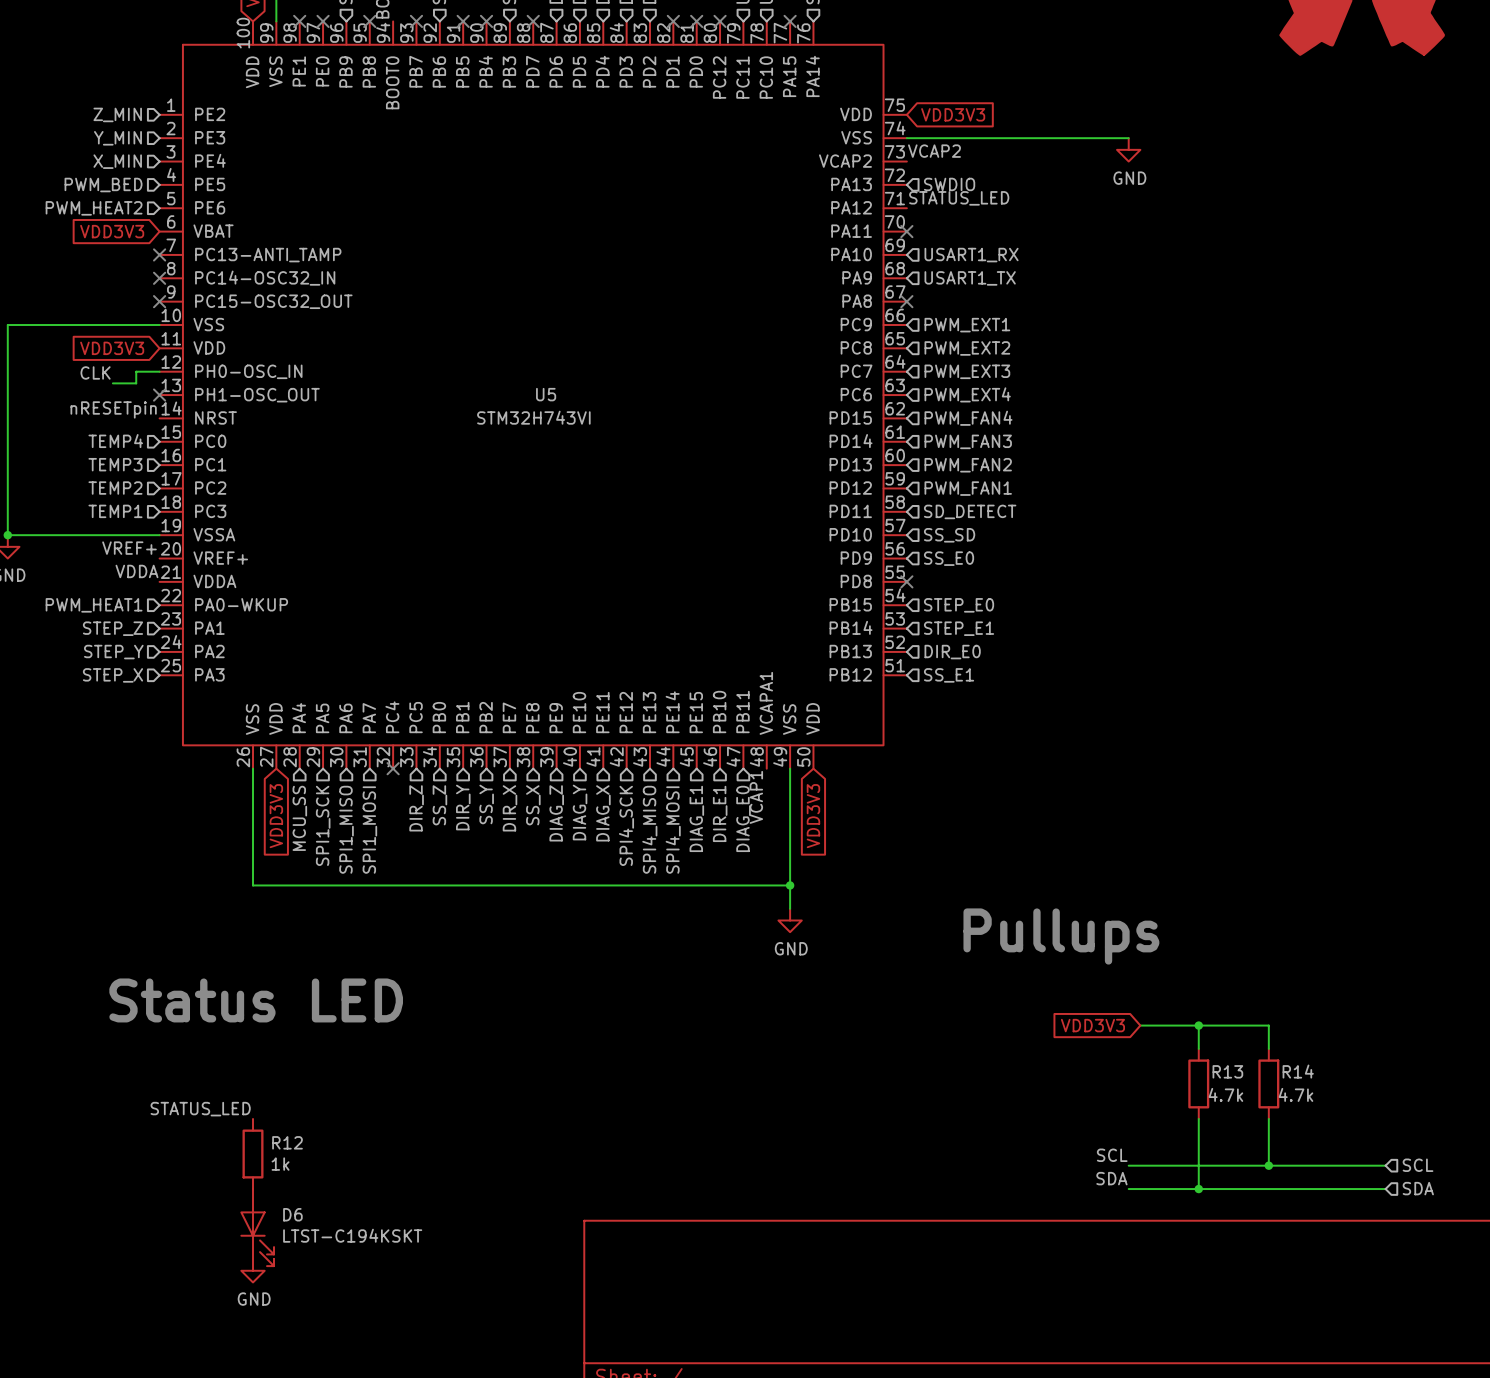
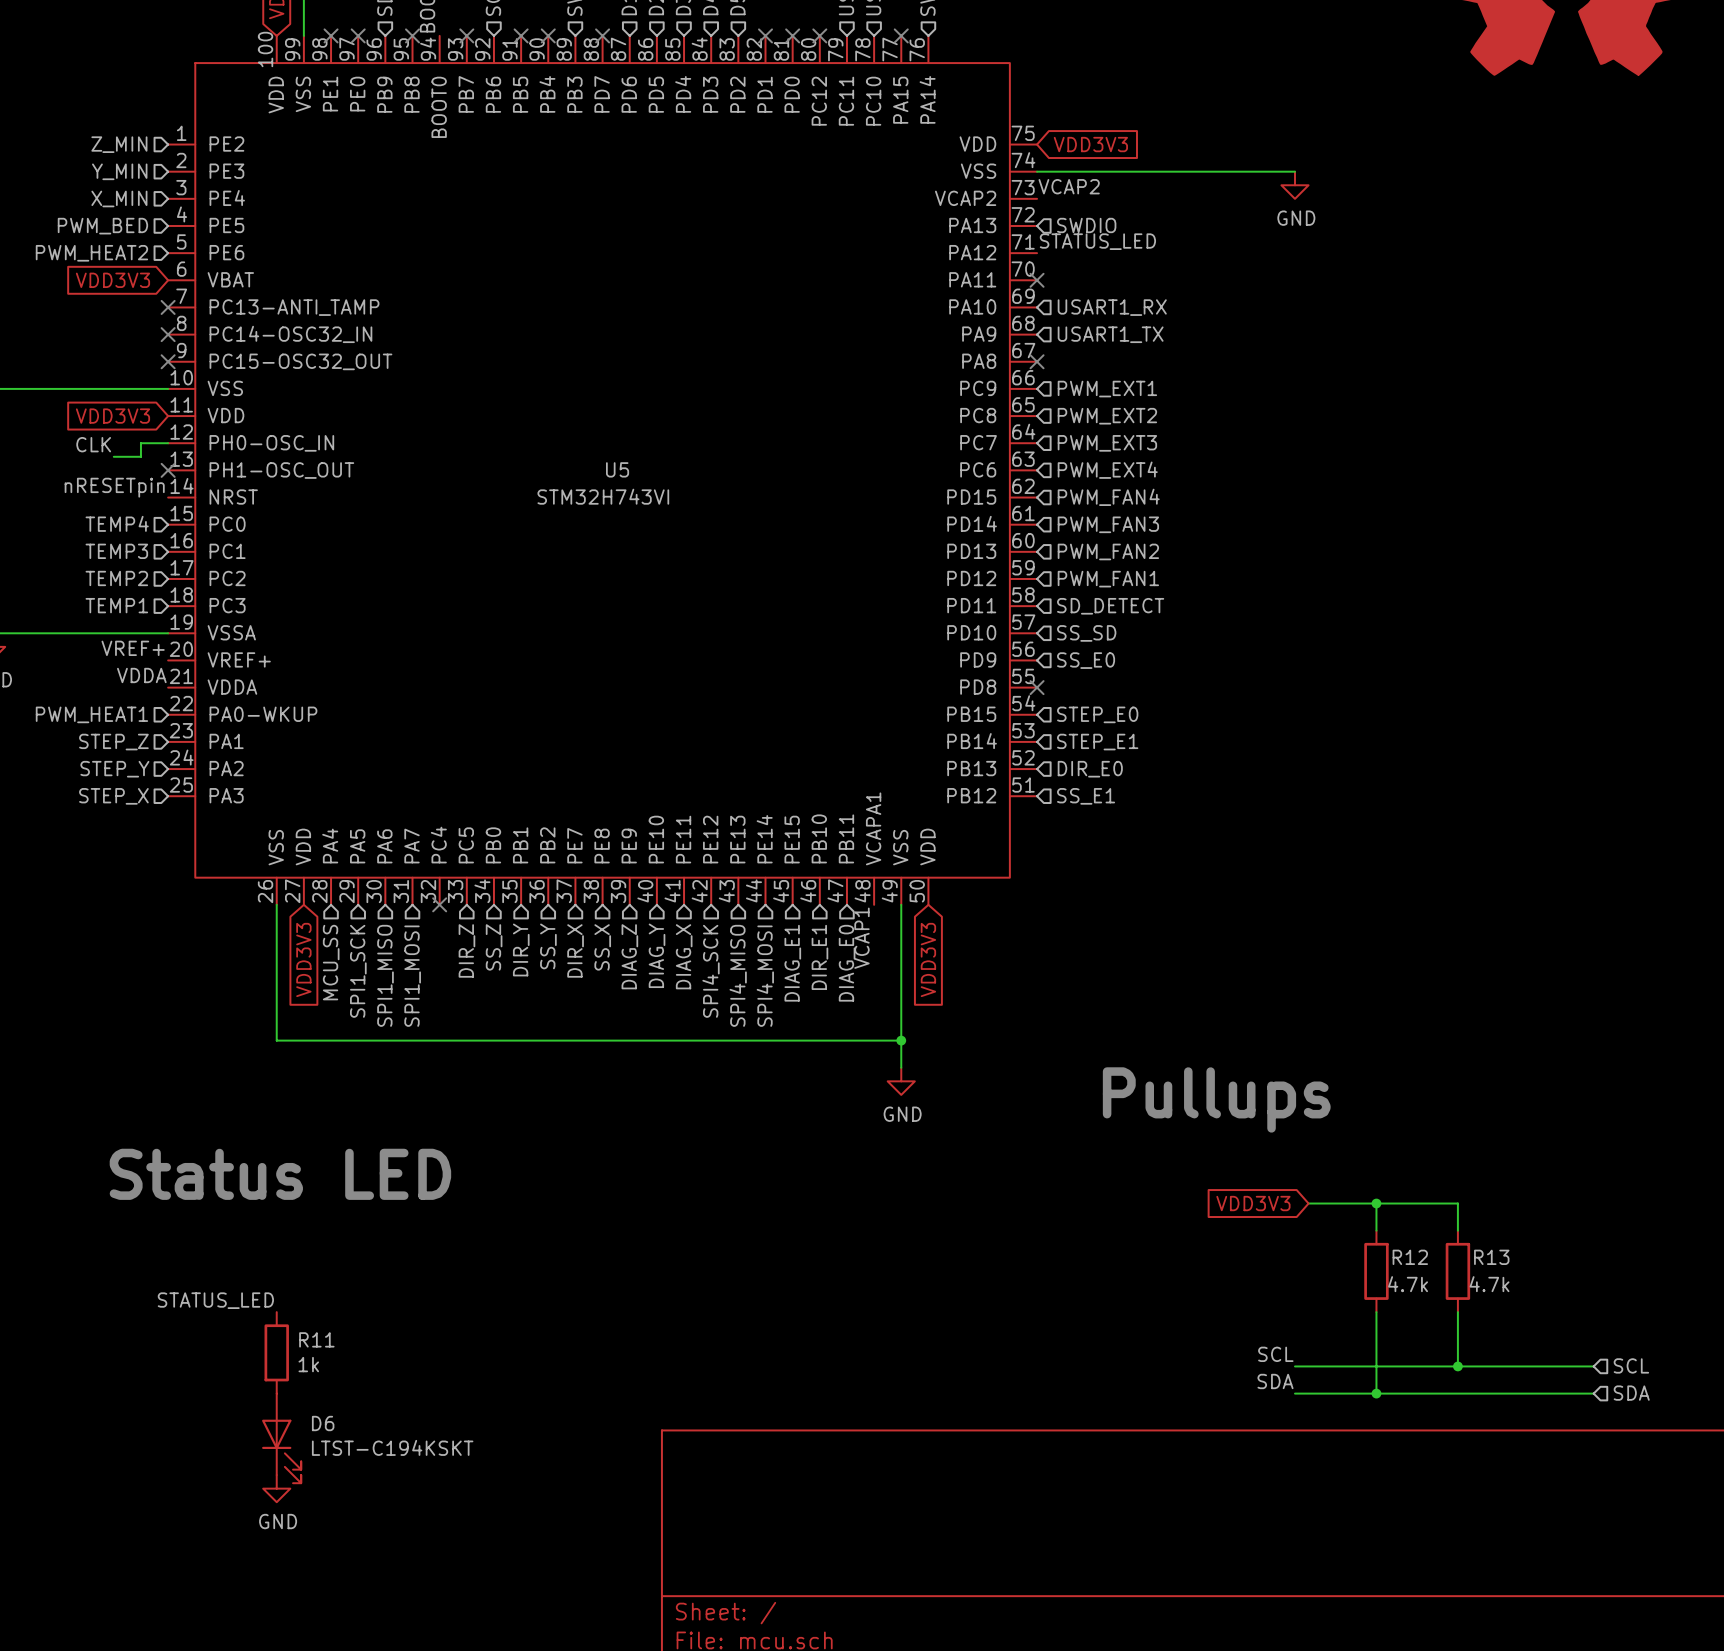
R13 name: R13 (1227, 1071) -> R12 (1410, 1257)
R14 name: R14 (1298, 1071) -> R13 (1491, 1257)
R12 name: R12 (287, 1142) -> R11 (316, 1339)

